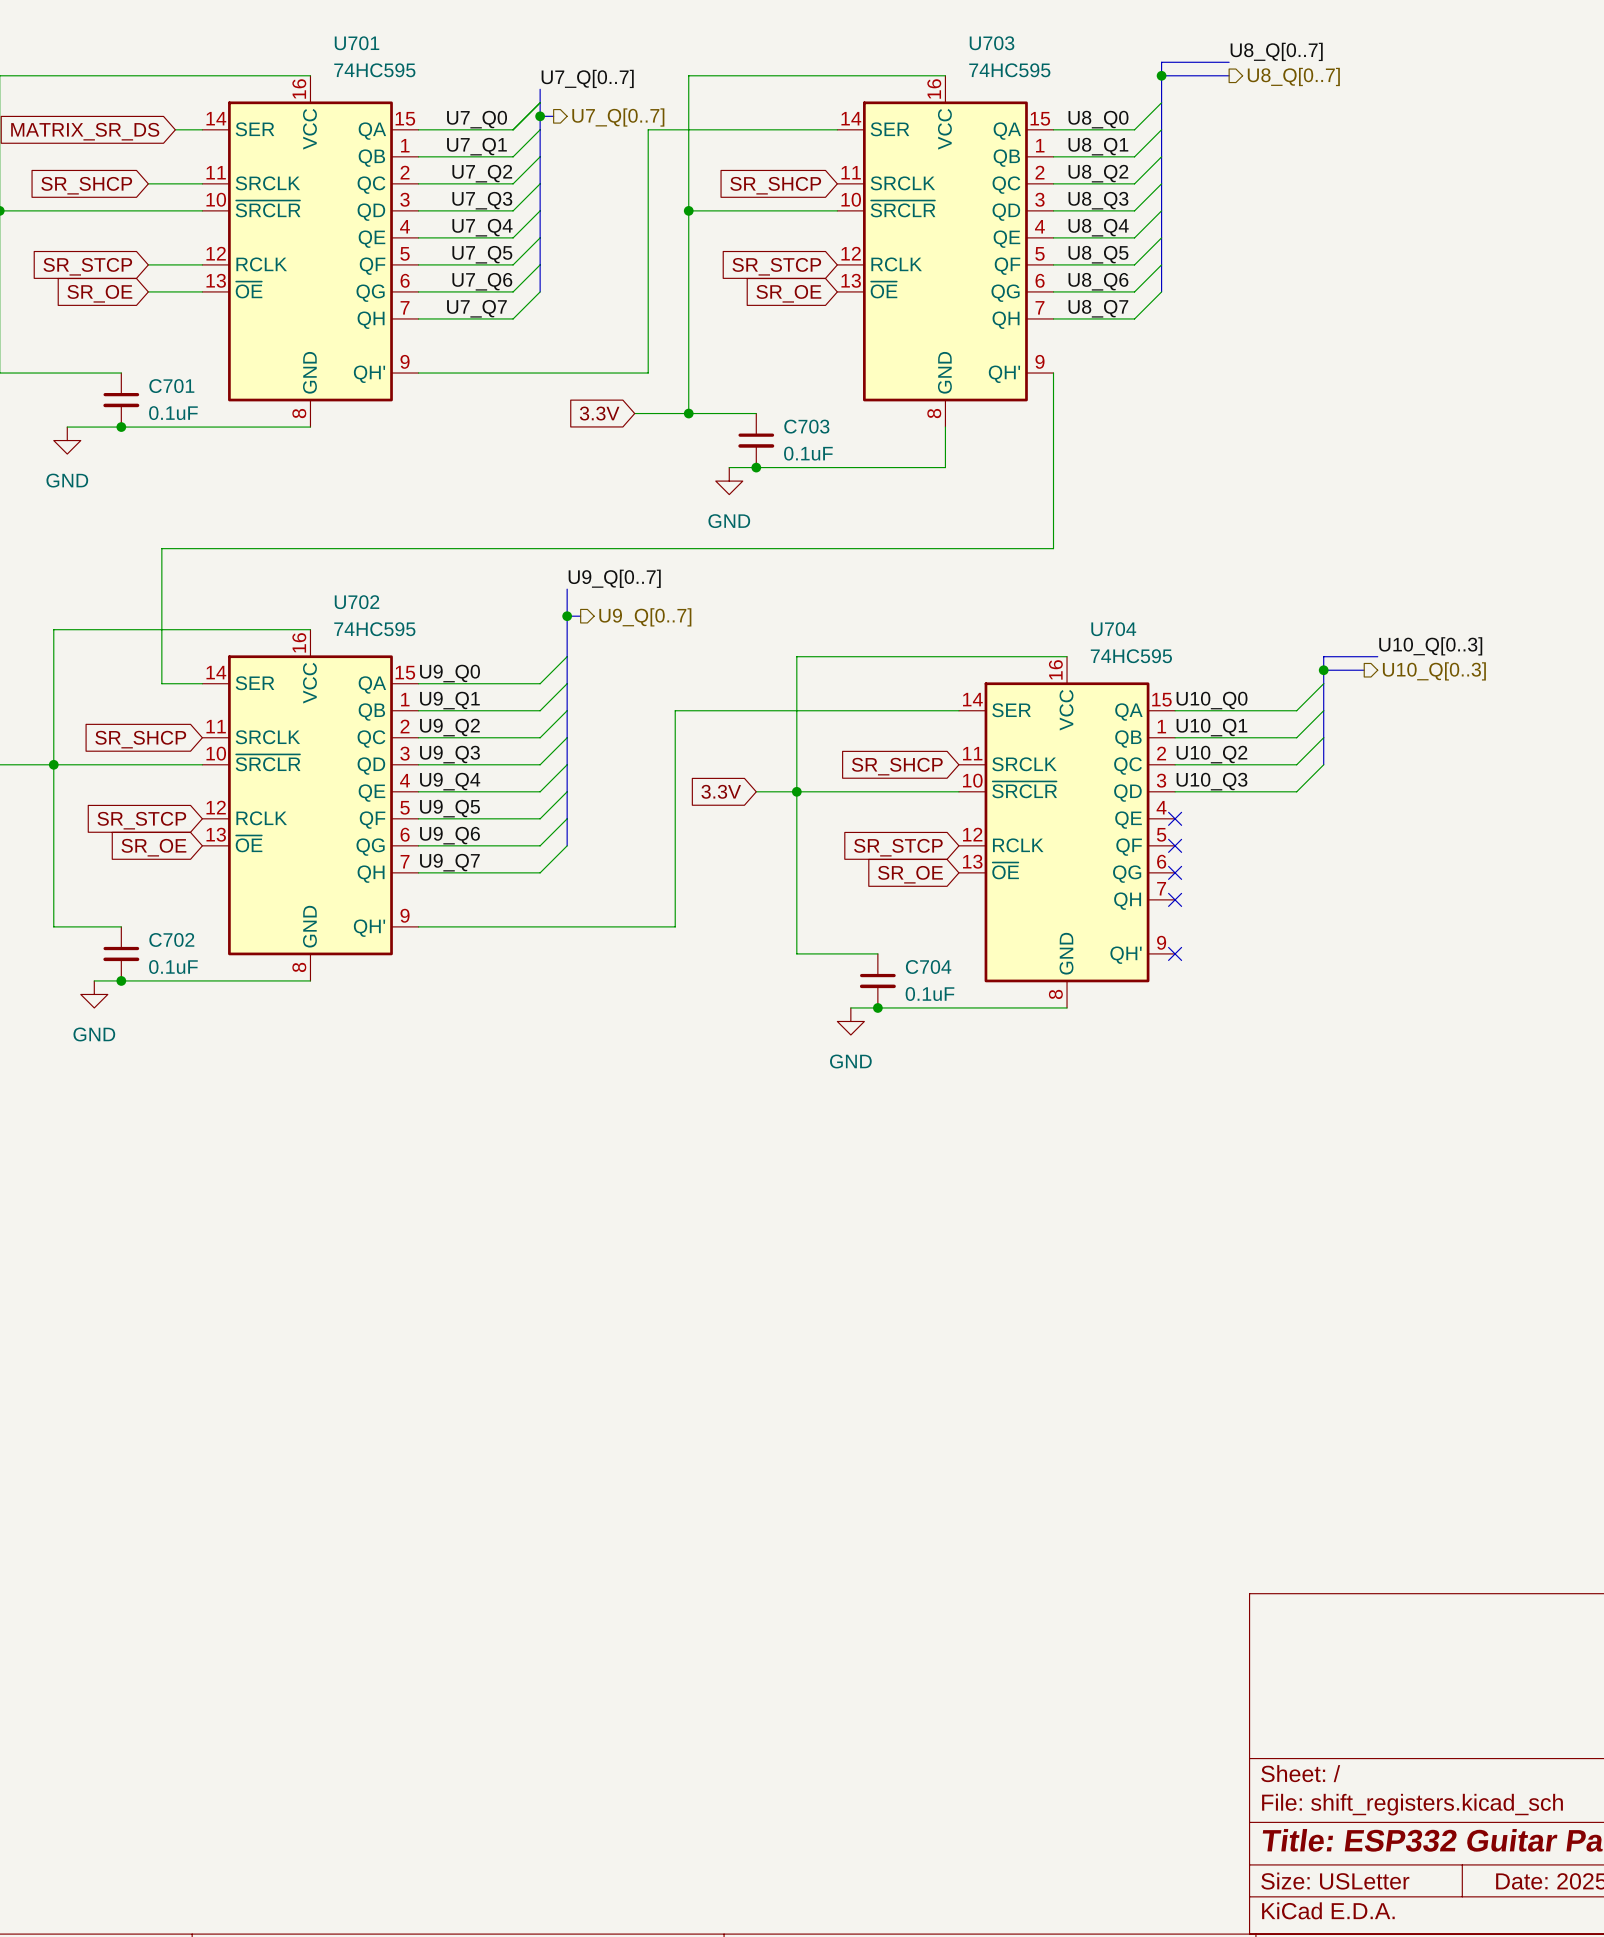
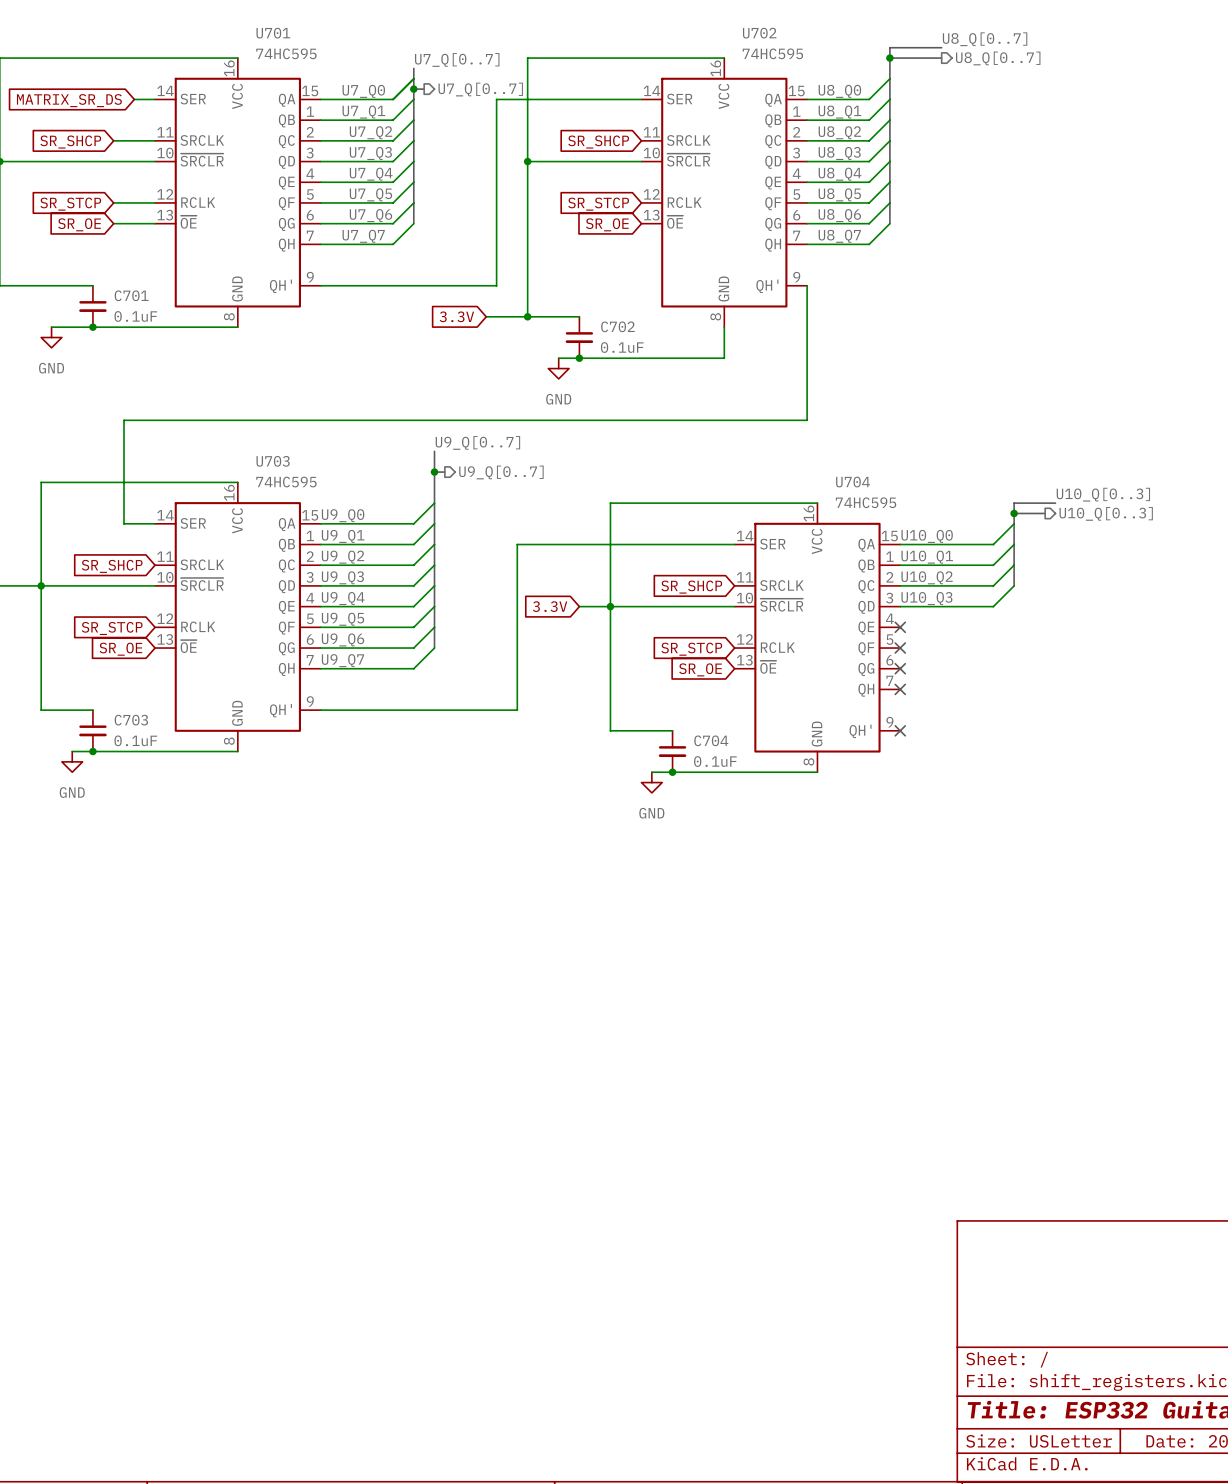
U703 name: U703 (992, 43) -> U702 (759, 33)
C703 name: C703 (806, 426) -> C702 (617, 326)
U702 name: U702 (357, 602) -> U703 (273, 461)
C702 name: C702 (171, 939) -> C703 (131, 720)

